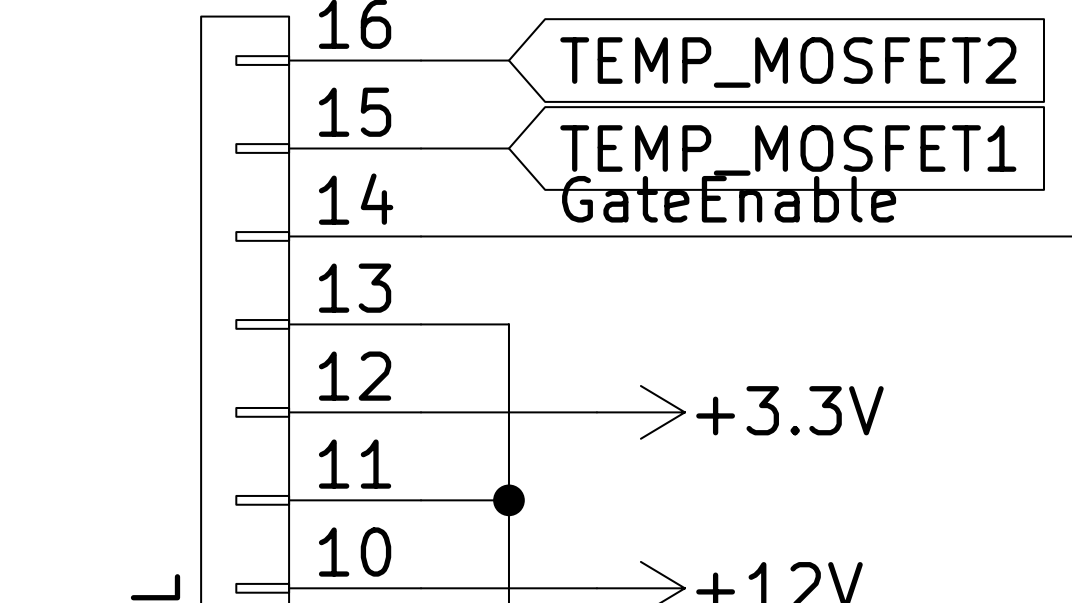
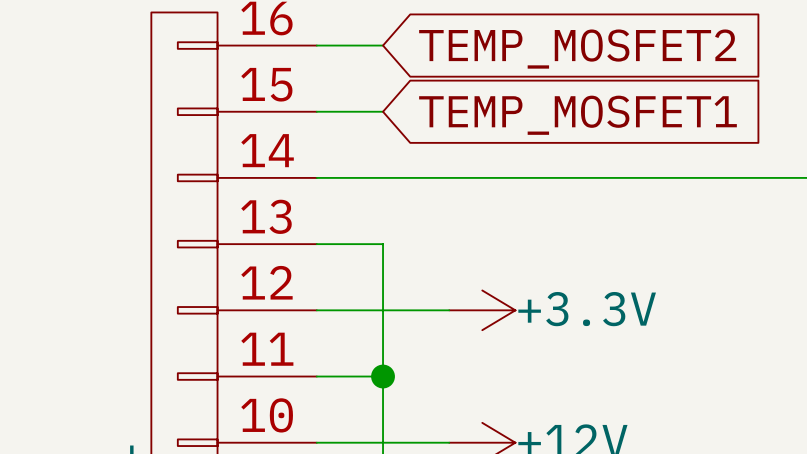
label: GateEnable (729, 199) -> none

